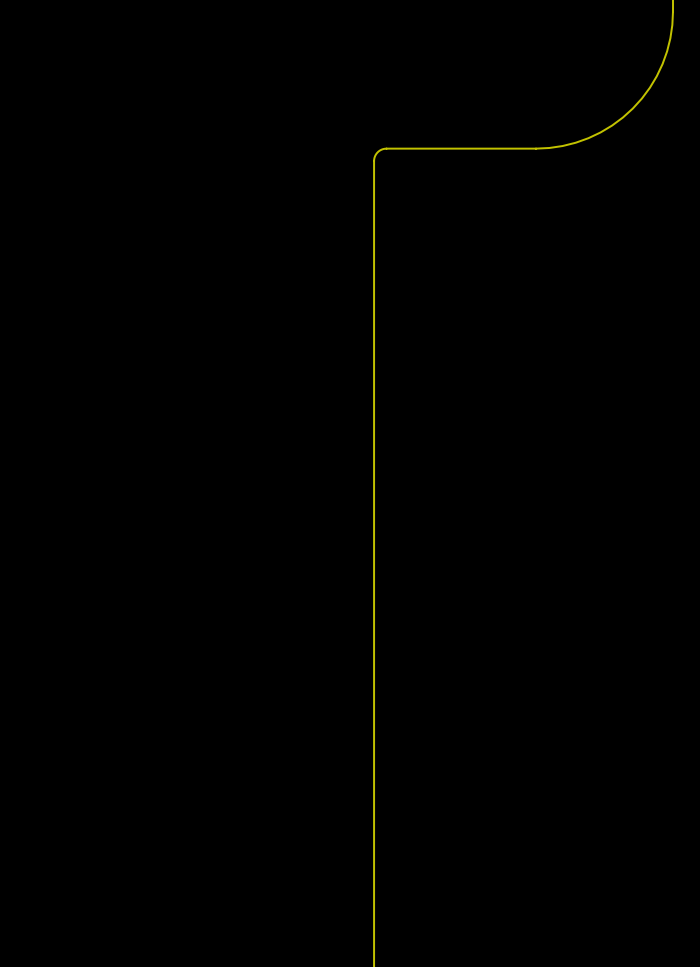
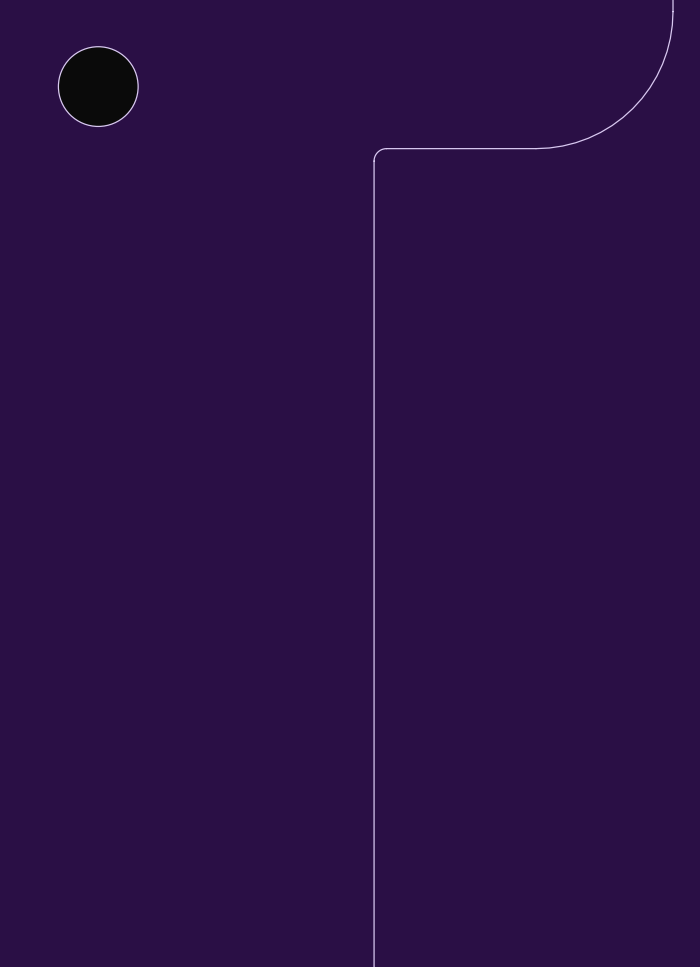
part: none -> (98, 86)

